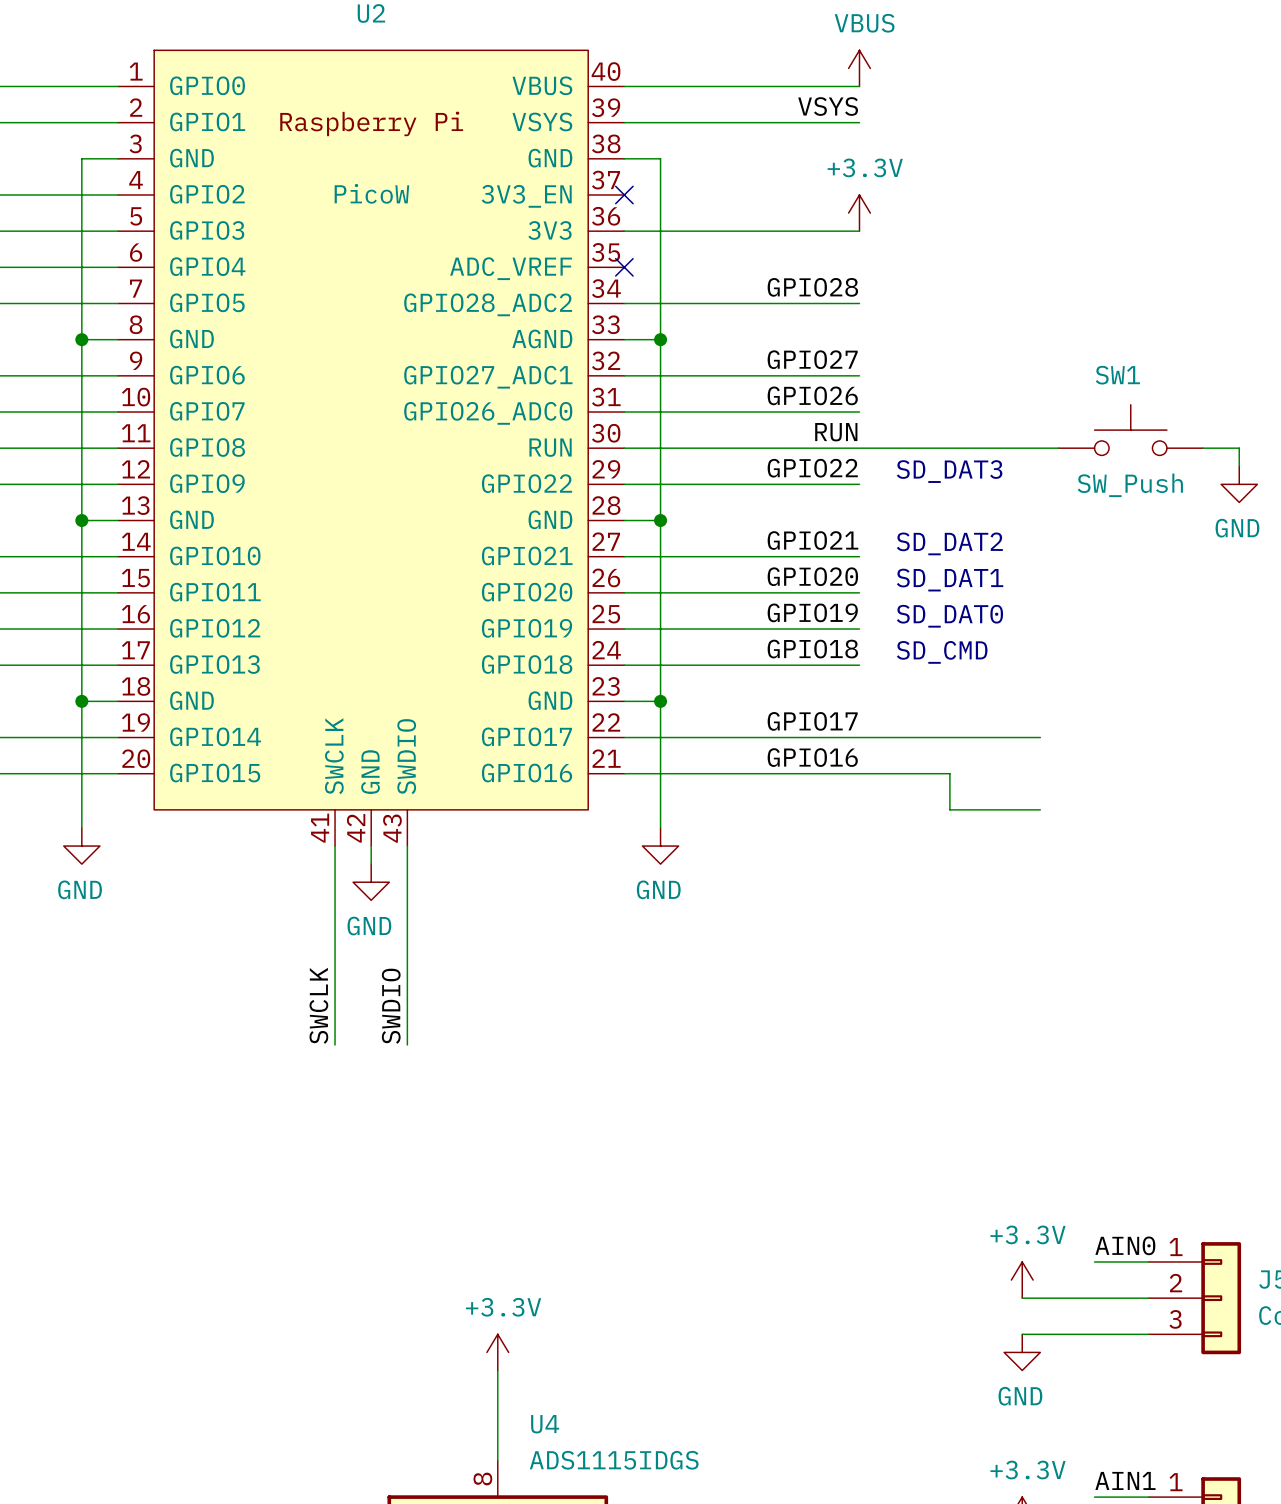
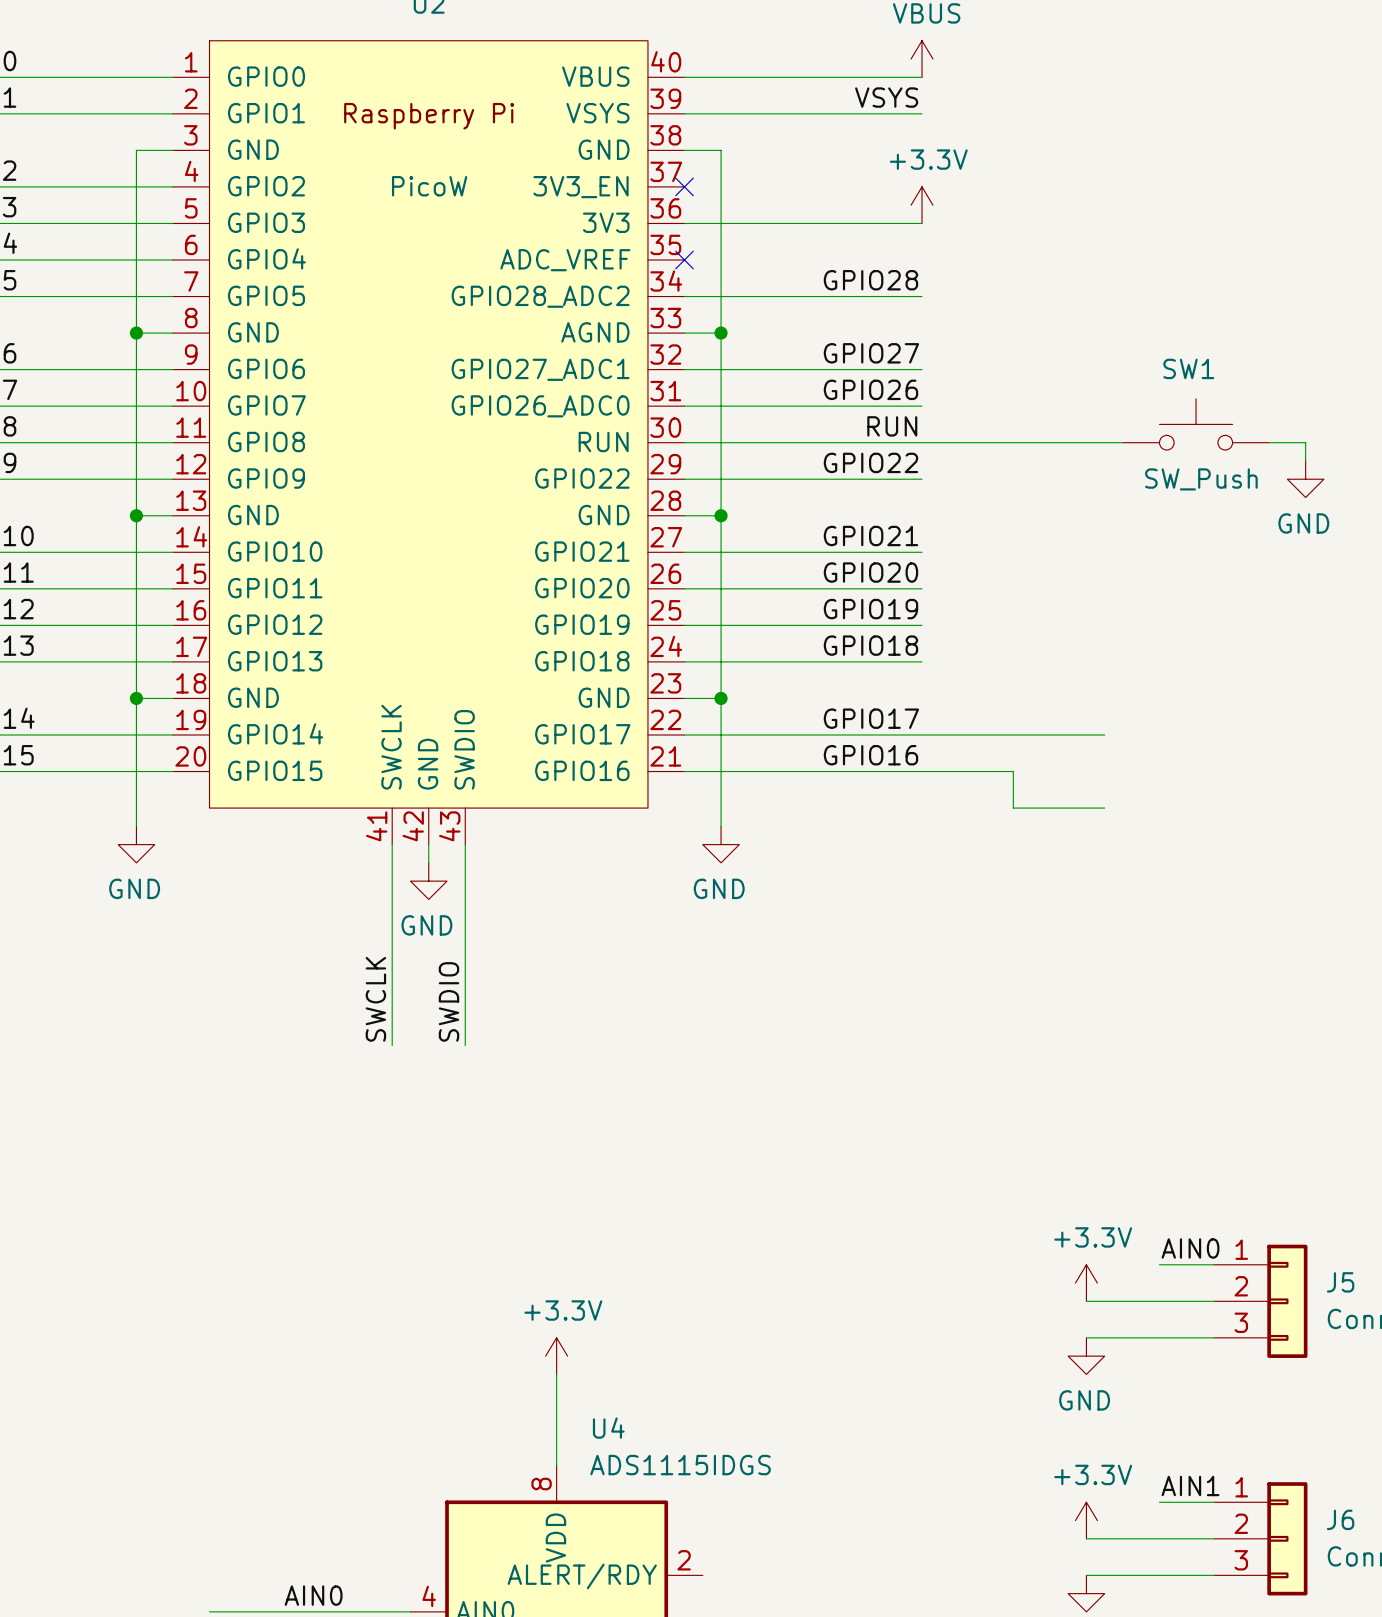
text: SD_DAT3 (949, 471) -> none
text: SD_DAT2 (949, 543) -> none
text: SD_DAT1 (950, 580) -> none
text: SD_DAT0 (949, 616) -> none
text: SD_CMD (942, 652) -> none

